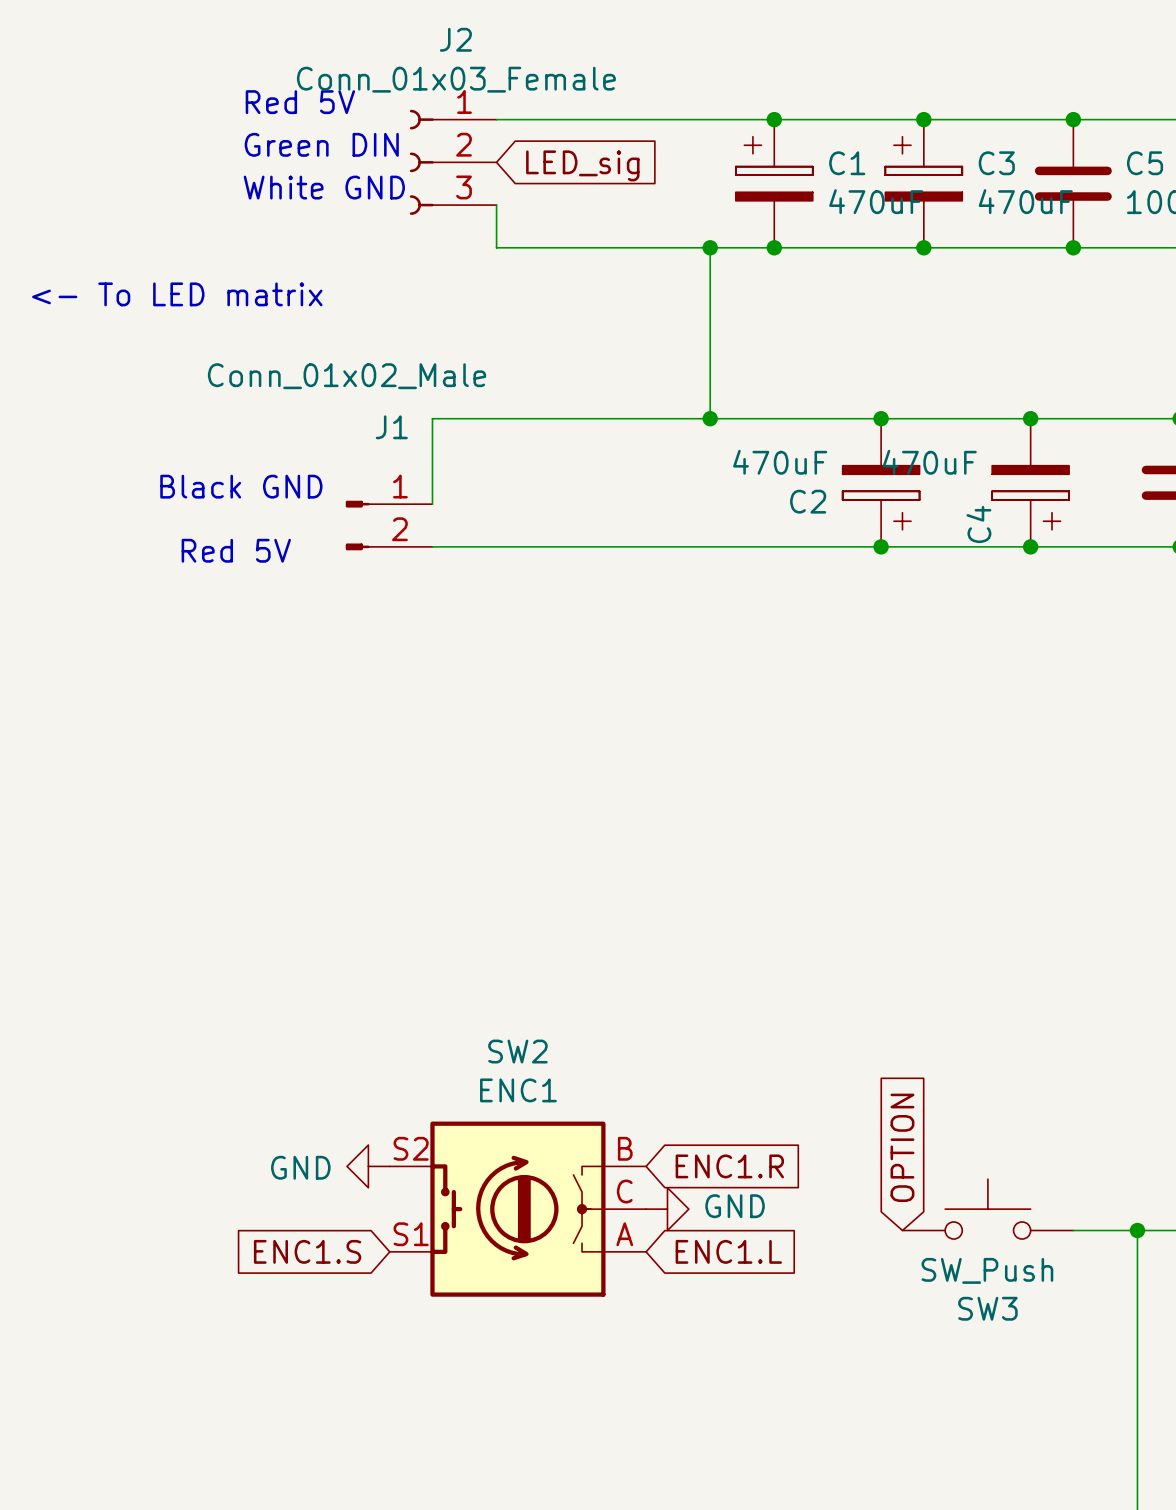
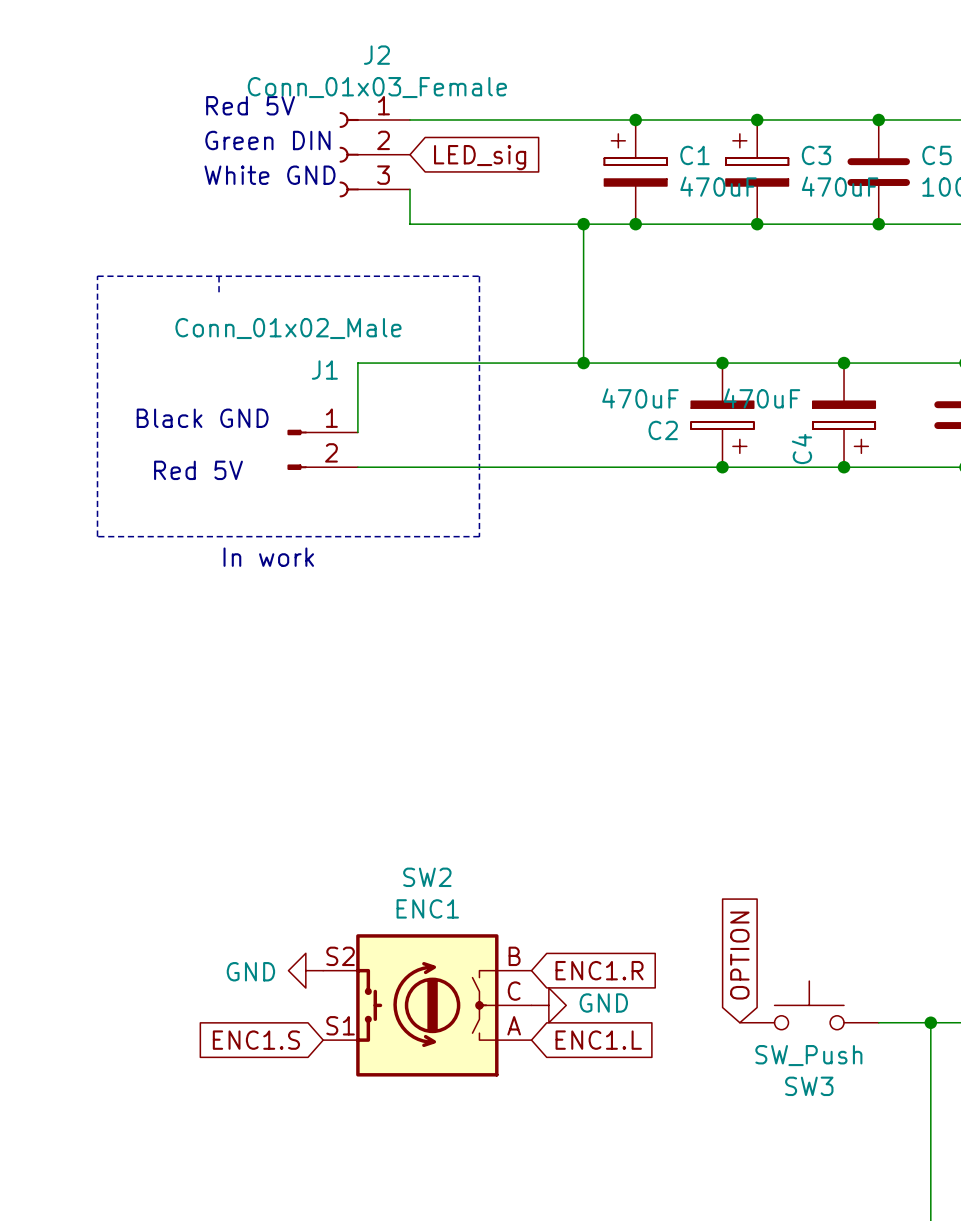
text: <- To LED matrix (177, 294) -> none
line: none -> (97, 276) (97, 536) (479, 536) (479, 276) (97, 276)
line: none -> (219, 276) (219, 293)
text: none -> In work (268, 557)

